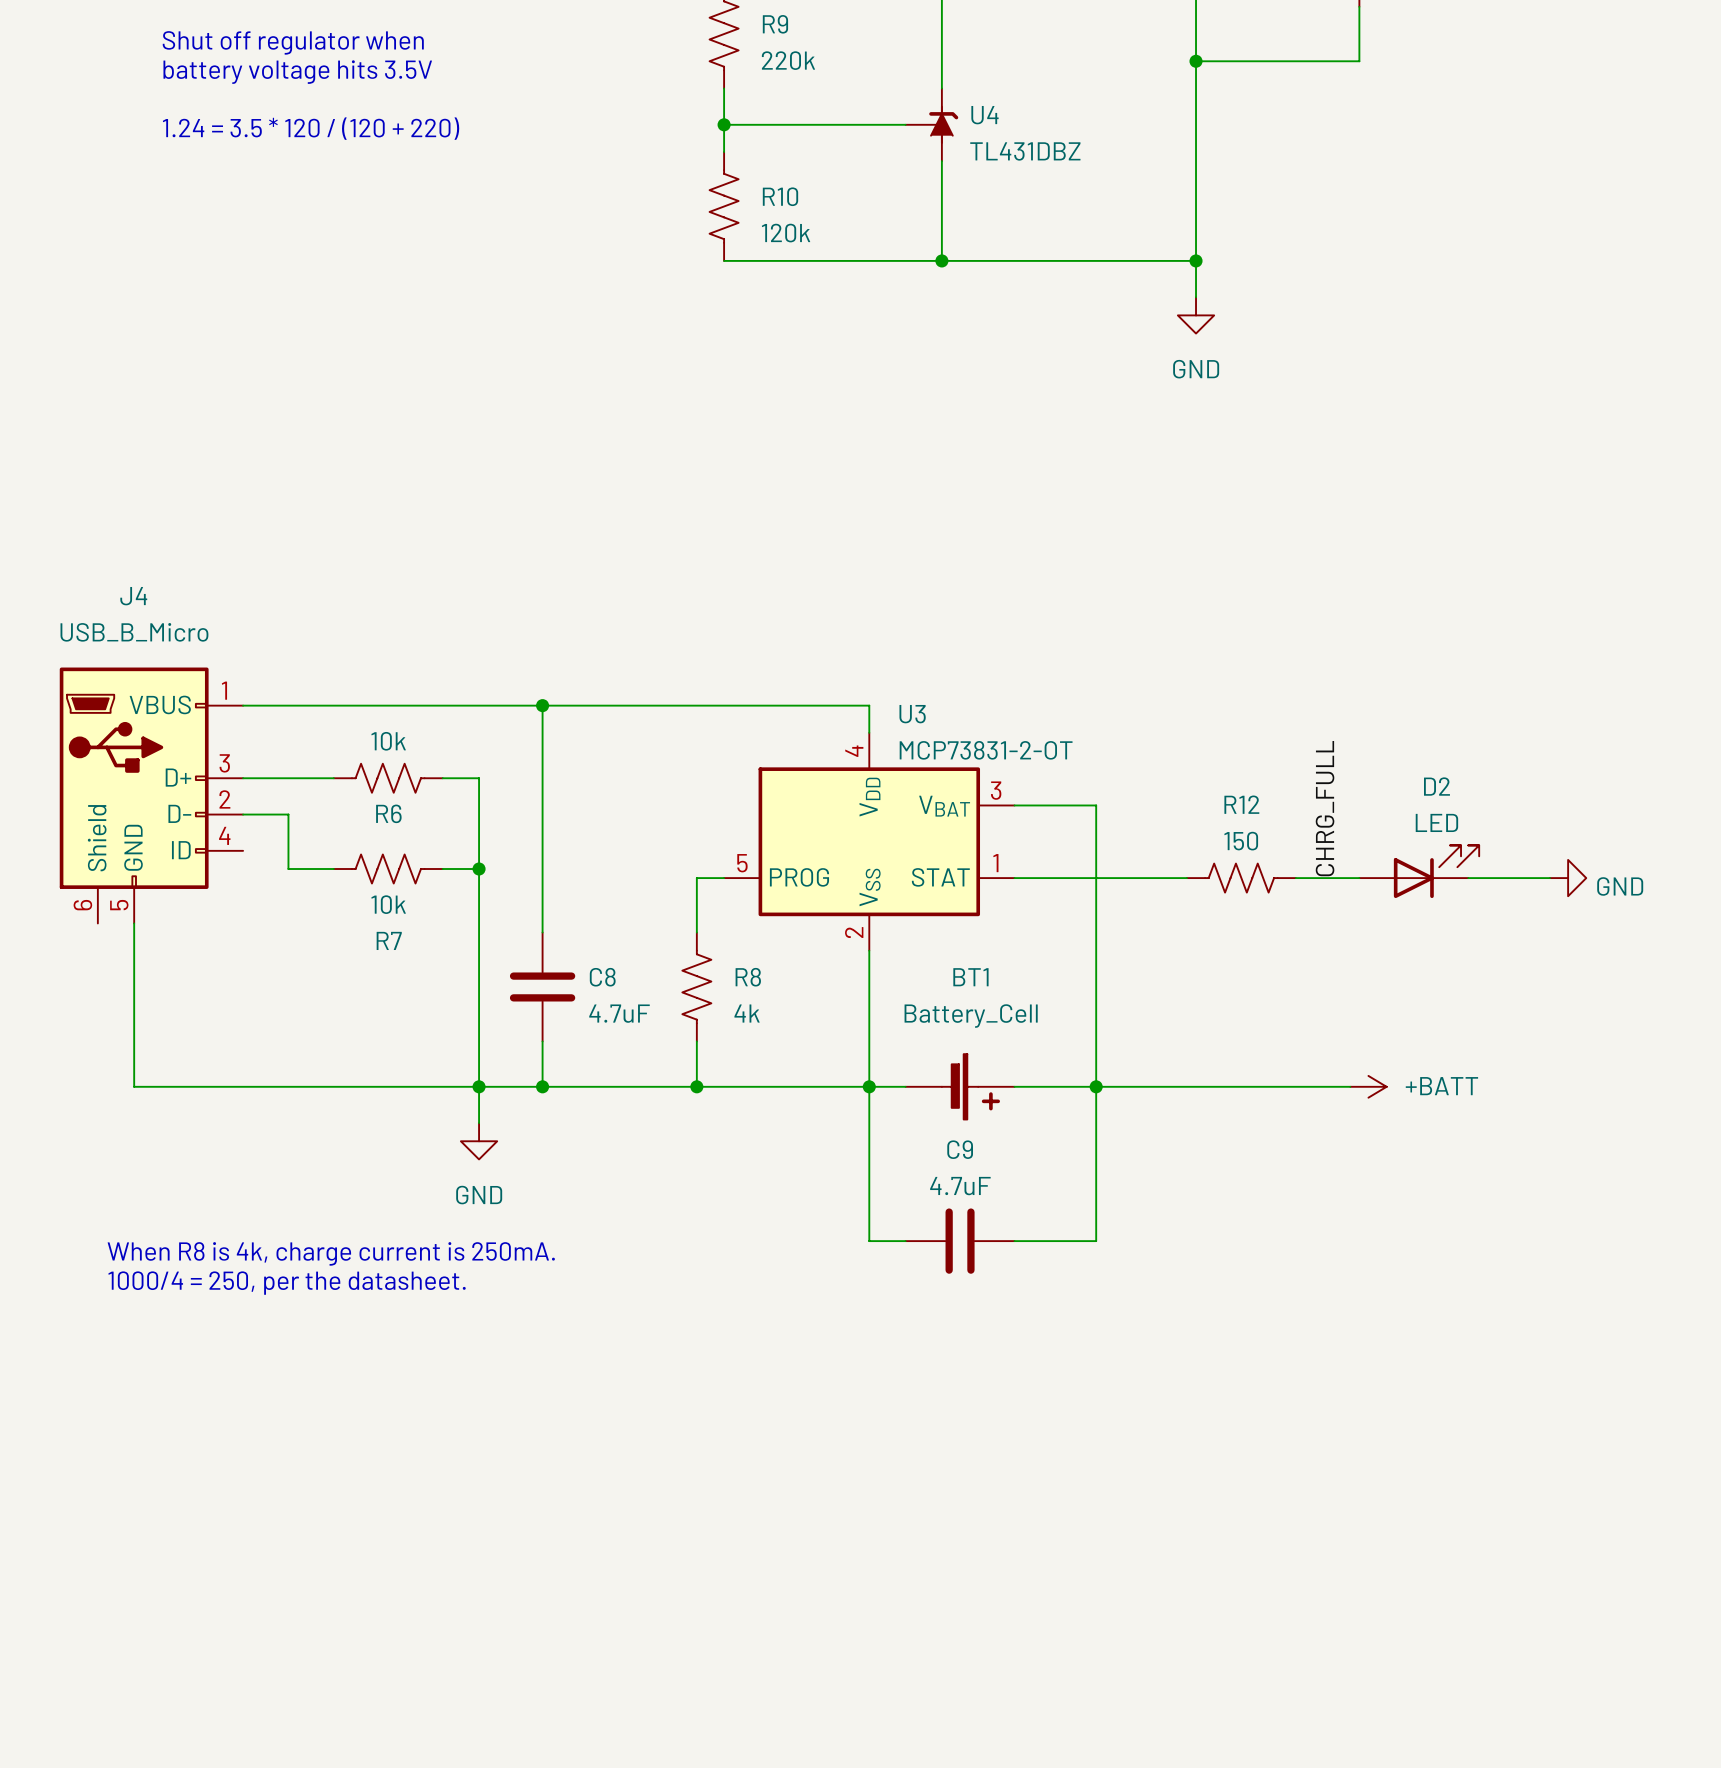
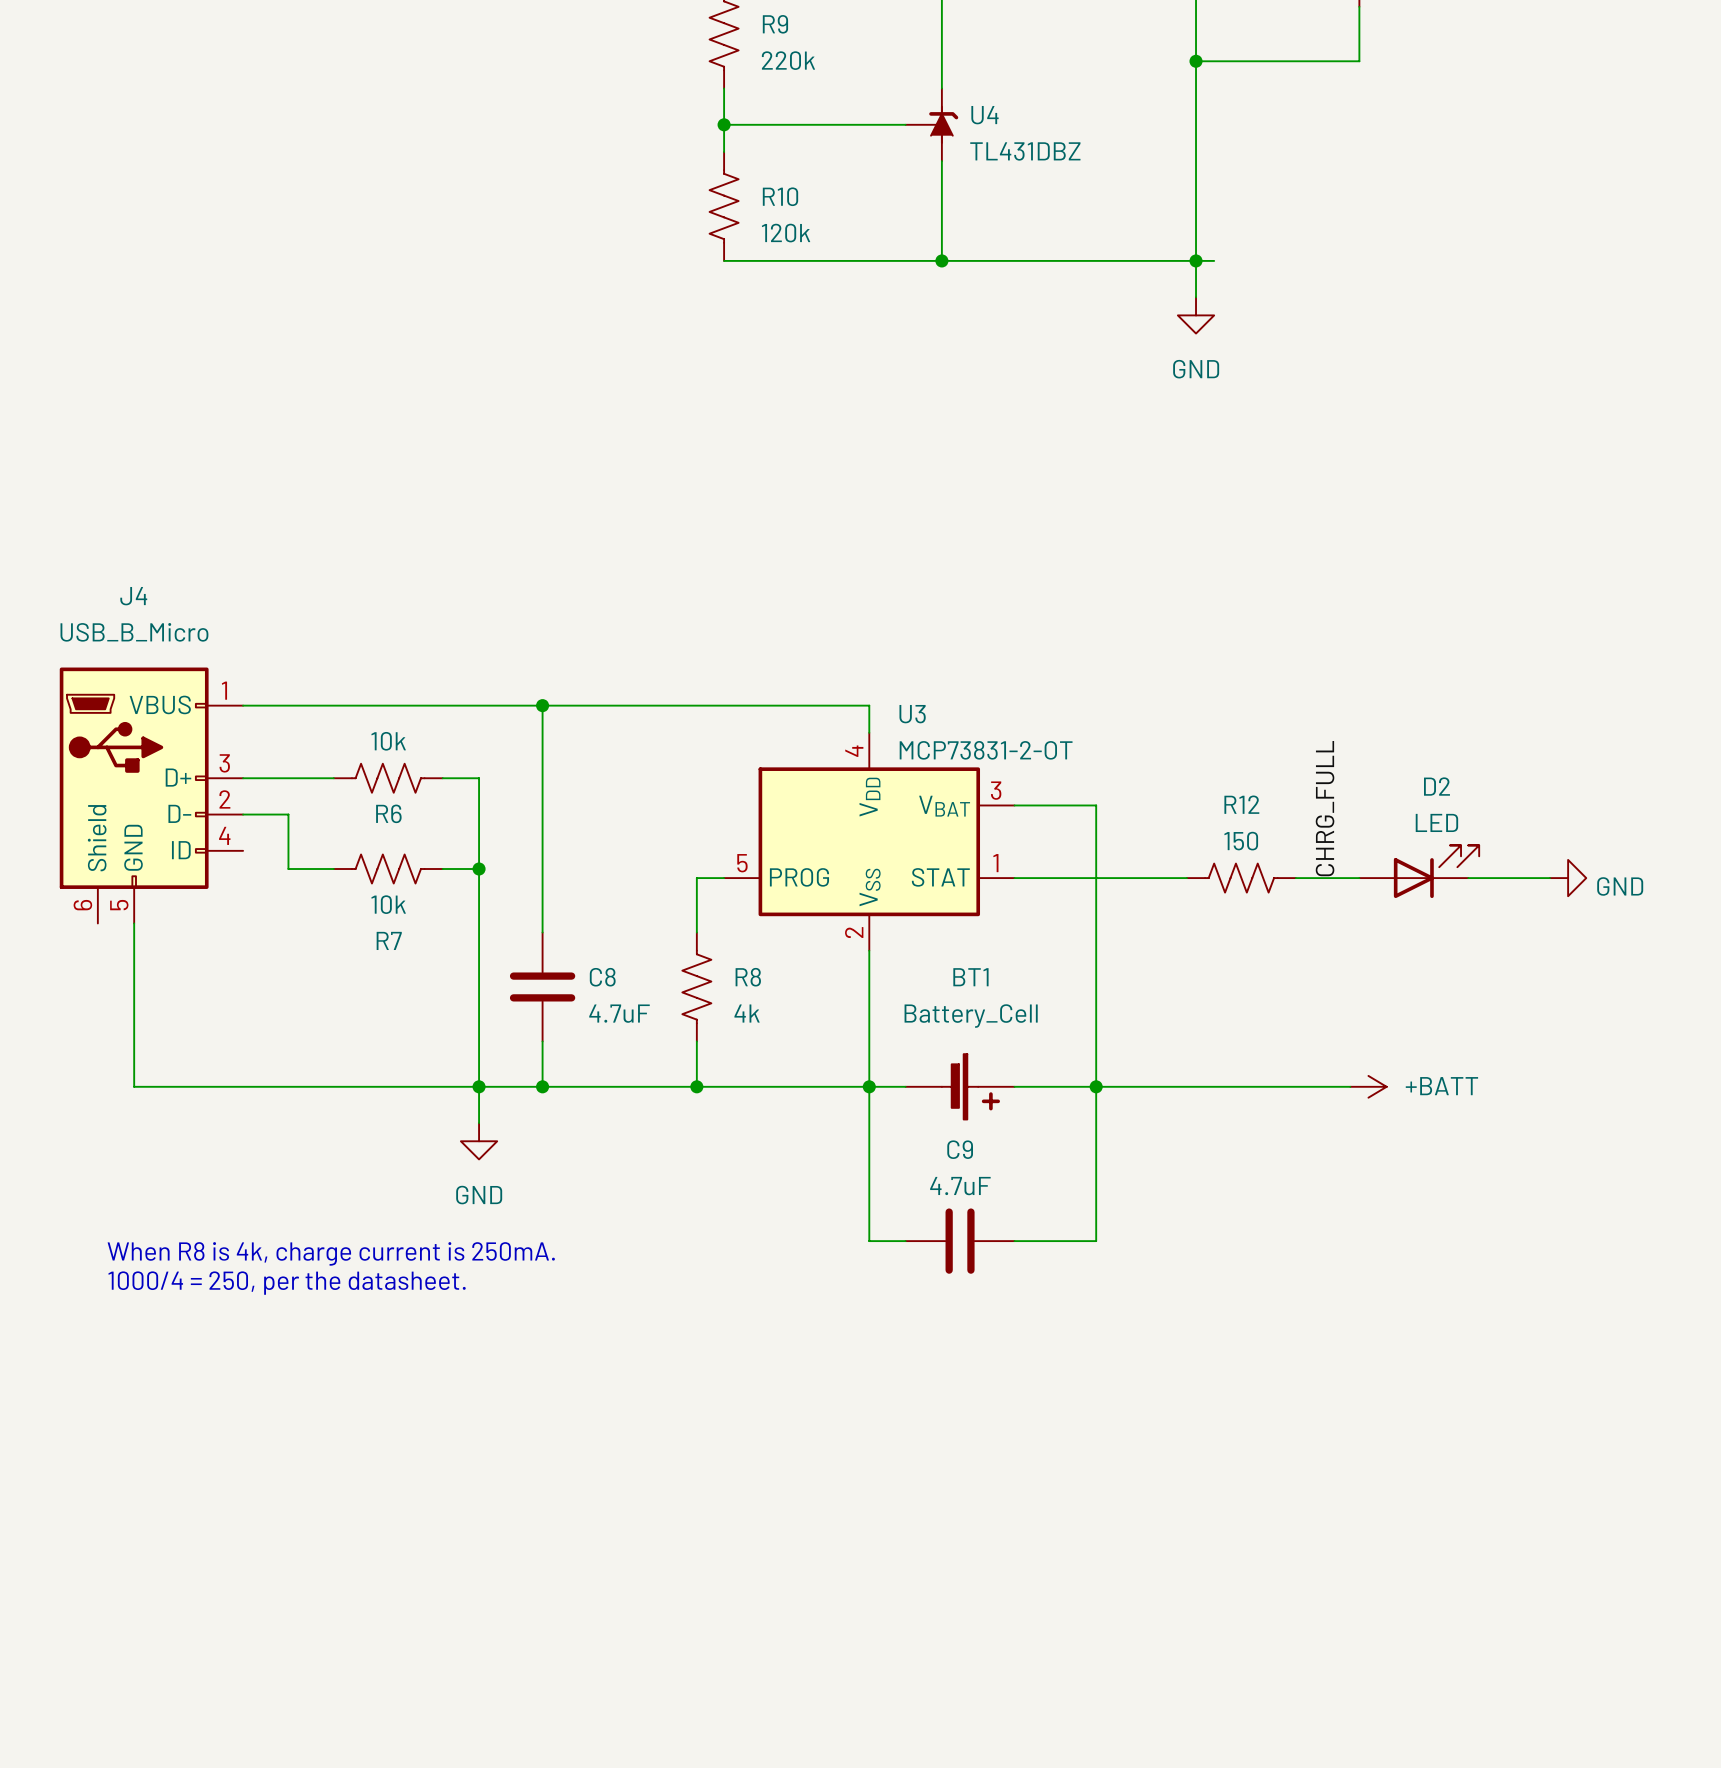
text: Shut off regulator when (293, 42) -> none
text: battery voltage hits 3.5V (297, 72) -> none
text: 1.24 = 3.5 * 120 / (120 + 220) (311, 128) -> none
wire: none -> (1196, 260) (1214, 260)

